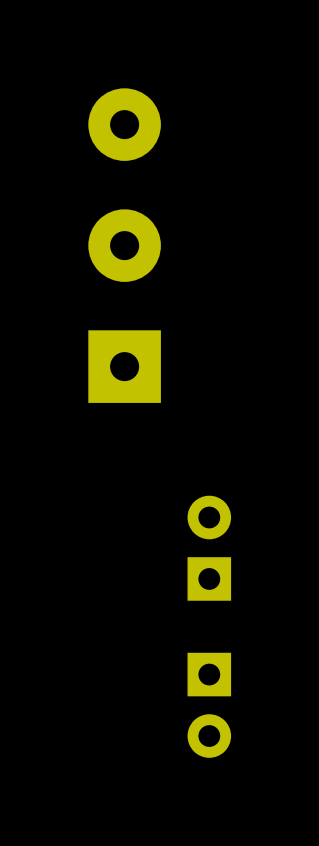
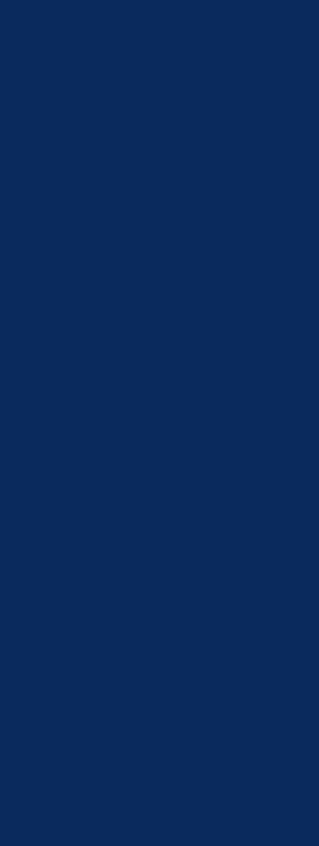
part: (124, 245) -> none
part: (209, 548) -> none
part: (209, 705) -> none

